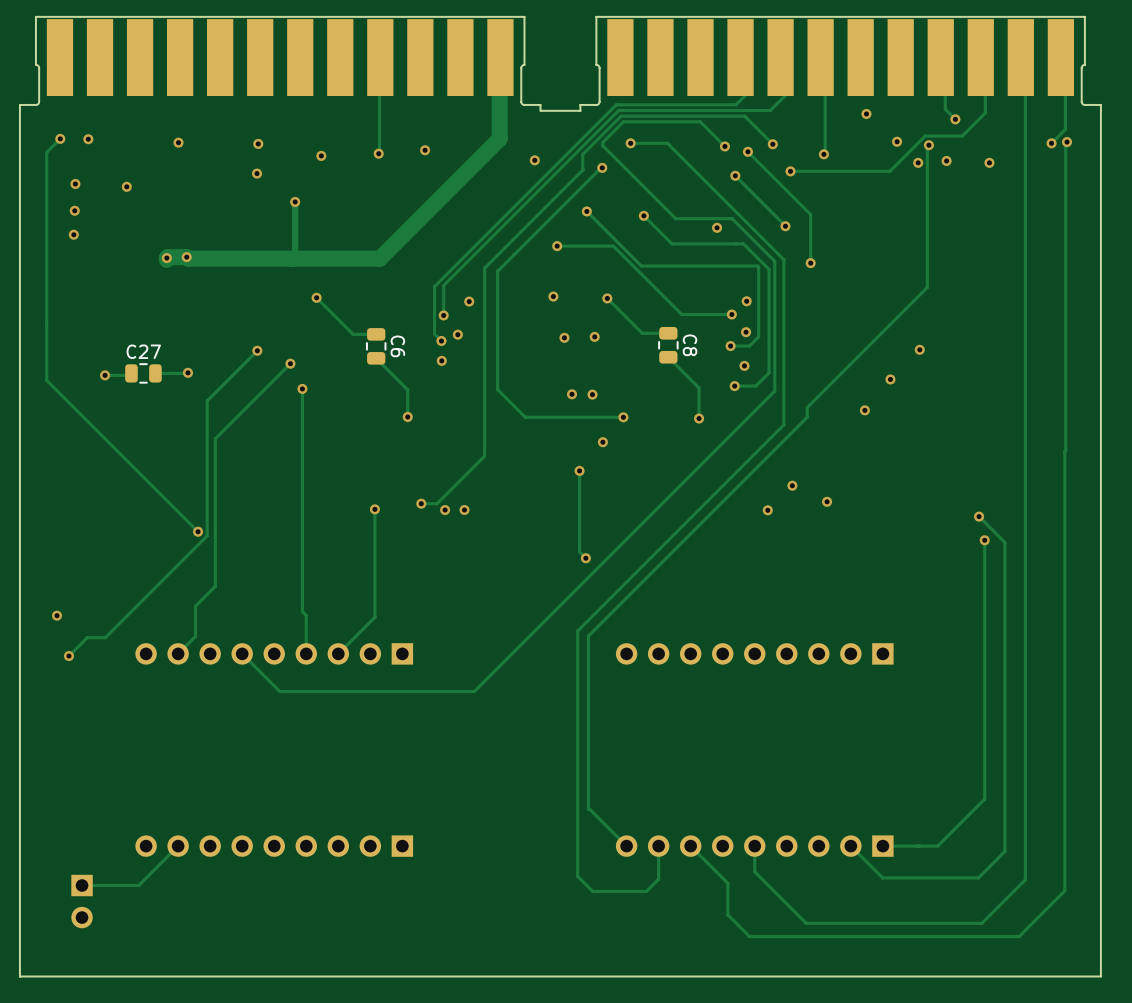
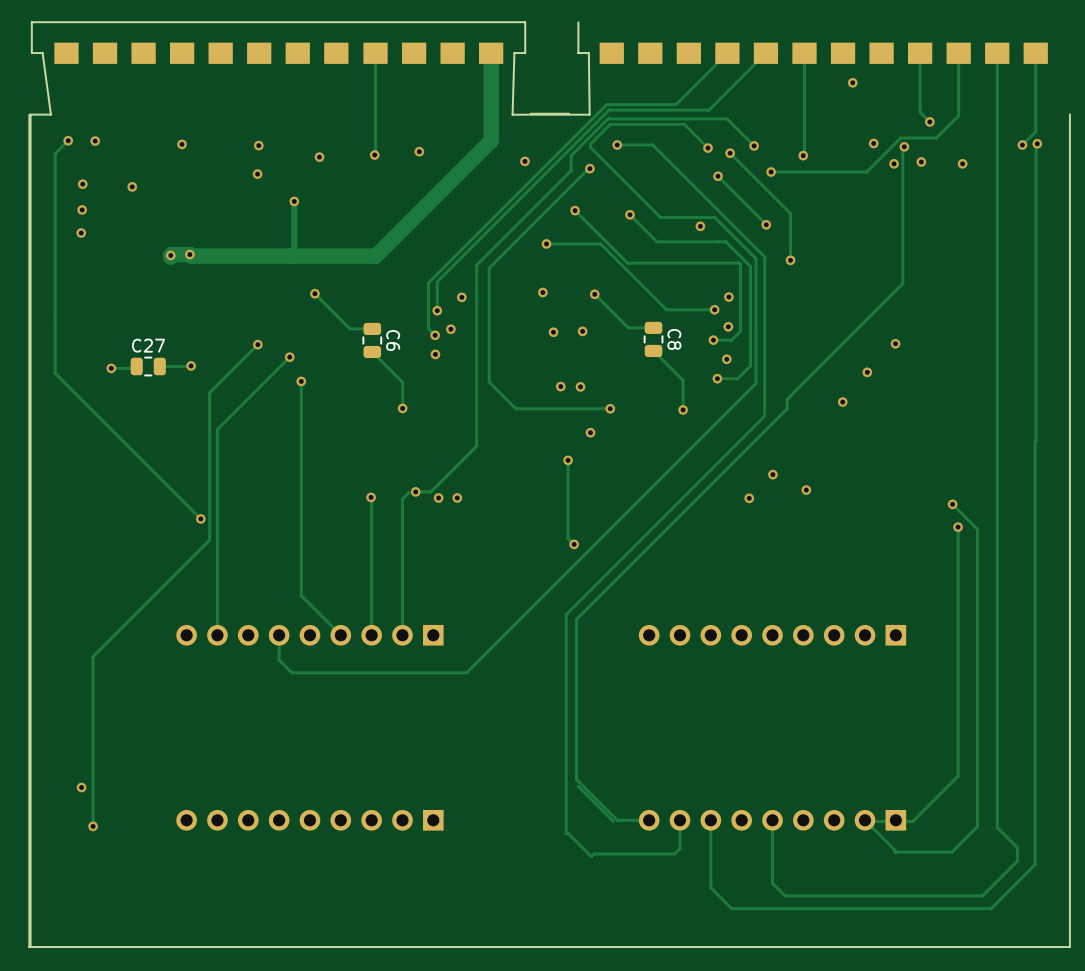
board edge: none -> (578, 22) (578, 53)
board edge: none -> (578, 53) (588, 53) (589, 114) (512, 114) (514, 53) (525, 53) (525, 22) (31, 22) (31, 53) (42, 53) (50, 114)
part: none -> (66, 53)
part: none -> (105, 53)
part: none -> (143, 53)
part: none -> (182, 53)
part: none -> (220, 53)
part: none -> (259, 53)
part: none -> (297, 53)
part: none -> (336, 53)
part: none -> (375, 53)
part: none -> (414, 53)
part: none -> (452, 53)
part: none -> (491, 53)
part: none -> (611, 53)
part: none -> (650, 53)
part: none -> (688, 53)
part: none -> (727, 53)
part: none -> (765, 53)
part: none -> (804, 53)
part: none -> (843, 53)
part: none -> (881, 53)
part: none -> (920, 53)
part: none -> (958, 53)
part: none -> (997, 53)
part: none -> (1035, 53)
track: (744, 57) (744, 95) (735, 104) (616, 104) -> (727, 53) (676, 104) (606, 104) (603, 107)
track: (784, 57) (784, 95) (770, 110) (618, 110) -> (765, 53) (709, 110) (609, 110) (605, 113)
part: (280, 63) -> none
part: (840, 63) -> none
board edge: none -> (50, 114) (30, 114) (30, 947)
via position: (866, 113) -> (852, 82)
track: none -> (409, 492) (402, 499) (402, 635)
track: (374, 509) (374, 617) (338, 653) -> none
track: none -> (371, 497) (371, 635)
track: (207, 535) (105, 637) (87, 637) (68, 656) -> (209, 522) (209, 540) (93, 656) (93, 826)
track: (215, 586) (195, 606) (195, 636) (178, 653) -> (217, 571) (217, 635)
via: (57, 615) -> none
track: (306, 615) (306, 653) -> (304, 599) (340, 635)
track: (242, 653) (279, 691) (292, 691) -> (279, 635) (279, 660) (291, 672)
part position: (274, 653) -> (309, 635)
part position: (754, 653) -> (772, 635)
via: (68, 656) -> none
track: (588, 802) (588, 809) -> (576, 779) (617, 820) (649, 820)
via: none -> (81, 787)
track: (178, 846) (138, 885) (82, 885) -> none
part position: (274, 846) -> (309, 820)
track: (658, 846) (658, 878) (646, 891) (592, 891) (577, 876) (577, 858) -> (680, 820) (680, 848) (674, 853) (594, 853) (591, 856) (566, 833)
track: (690, 846) (727, 883) -> (710, 820) (710, 857)
track: (754, 846) (754, 871) (806, 923) -> (772, 820) (772, 883) (786, 895)
part position: (754, 846) -> (772, 820)
track: (850, 846) (882, 877) (919, 877) -> (865, 820) (894, 852)
via: none -> (93, 826)
track: (1025, 852) (1025, 879) (981, 923) -> (997, 827) (1017, 847) (1017, 860) (982, 895) (955, 895)
part: (82, 901) -> none

